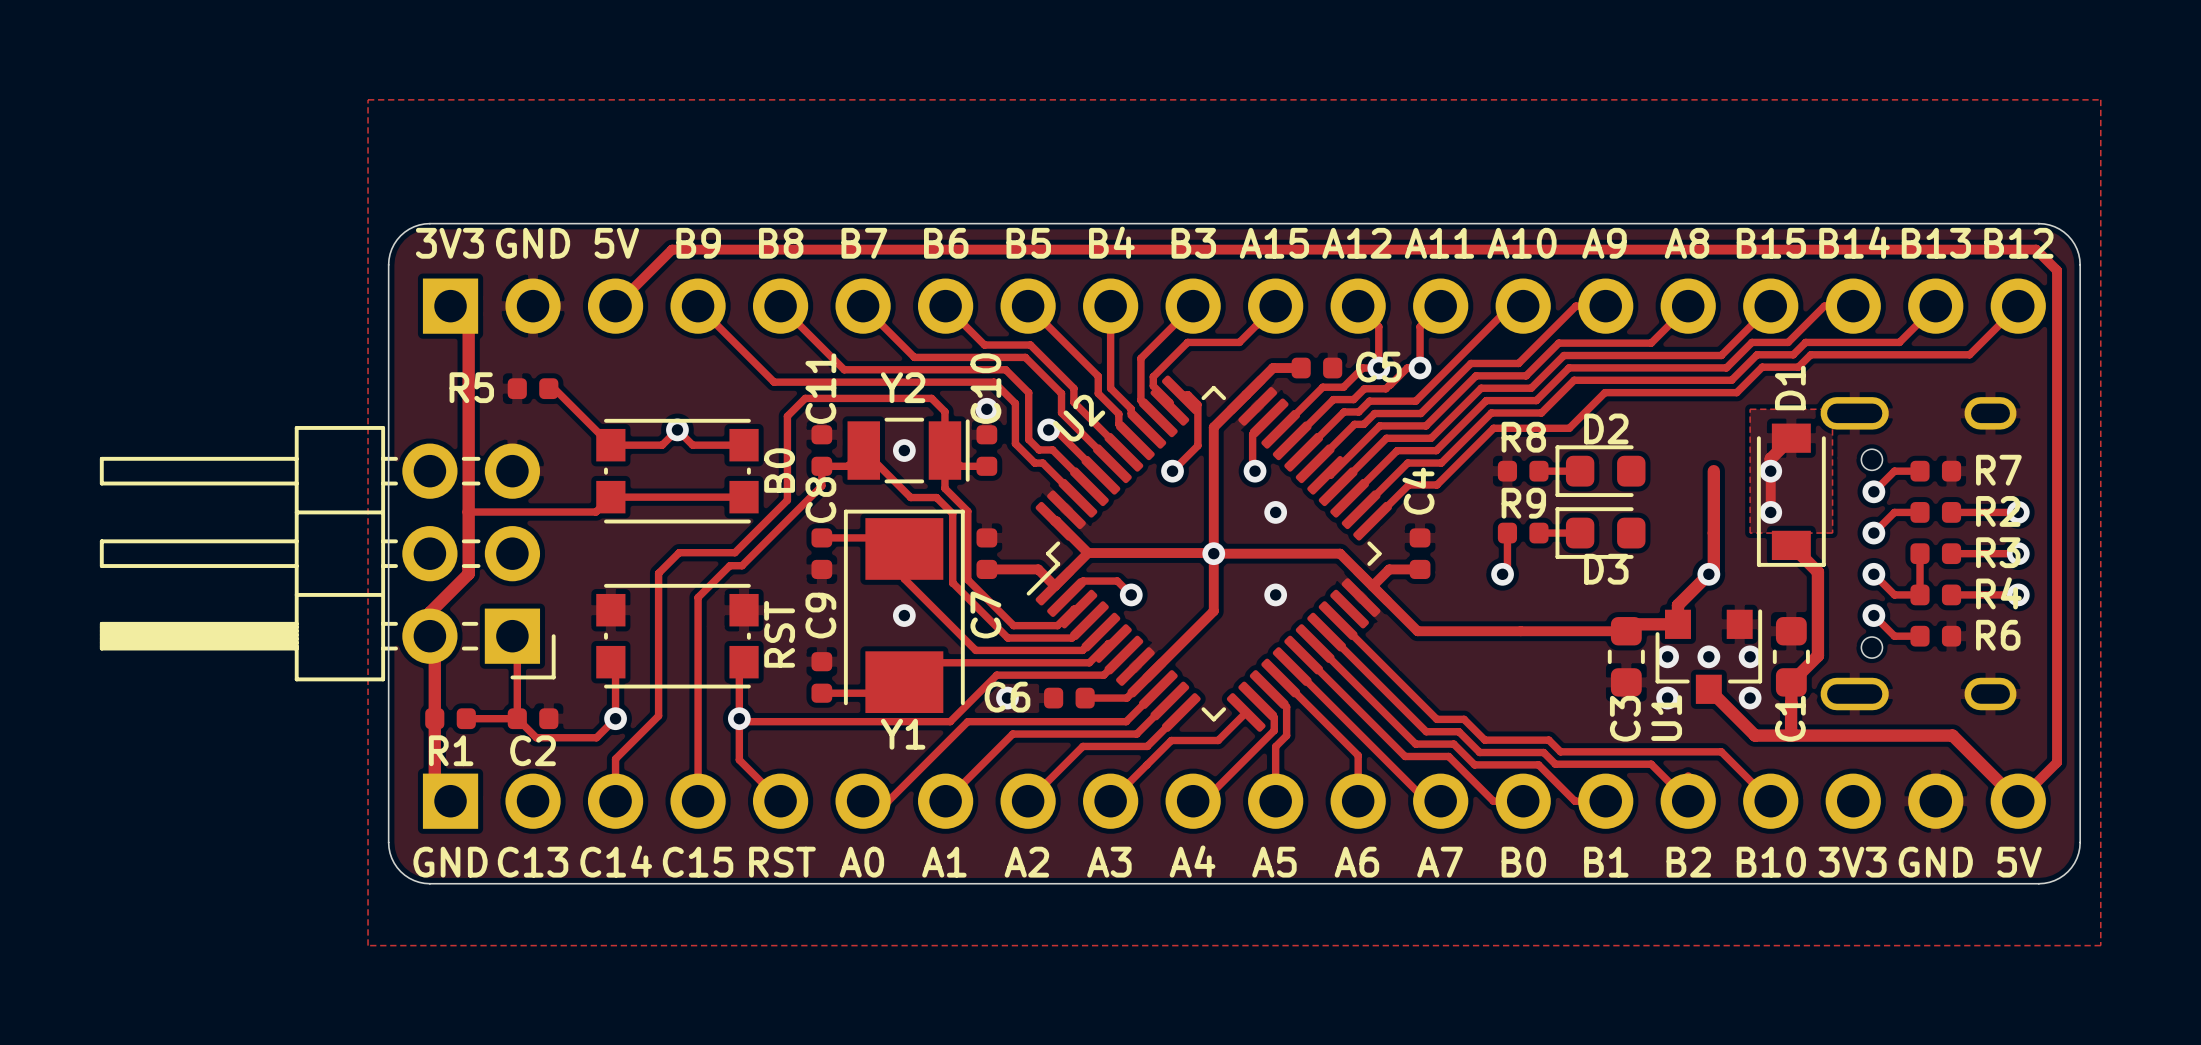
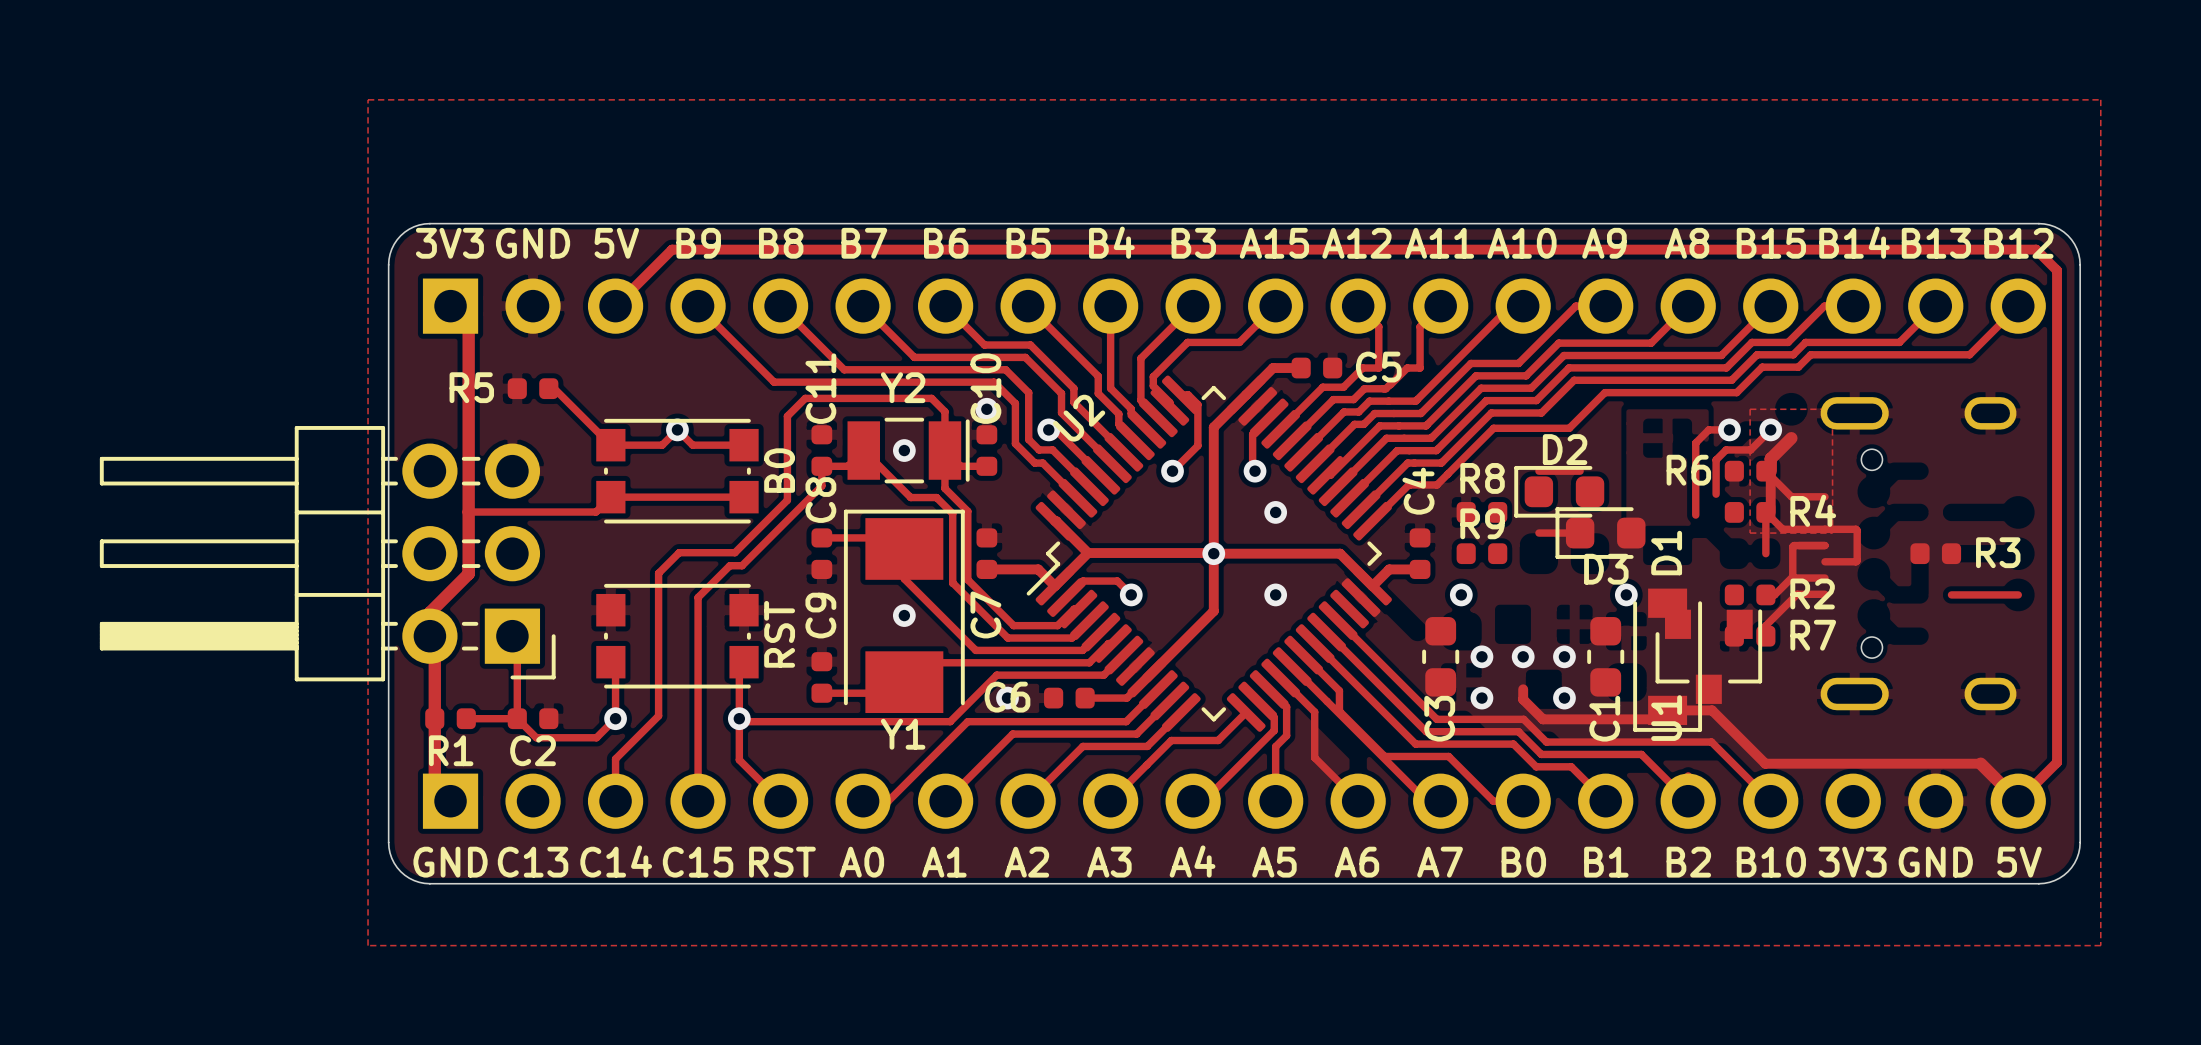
via: (1378, 368) -> none
via: (1420, 368) -> none
track: none -> (1729, 429) (1708, 429) (1695, 443) (1695, 515)
via: none -> (1729, 429)
track: none -> (1770, 429) (1750, 449) (1726, 449) (1716, 459) (1716, 494)
via: none -> (1770, 429)
R8 position: (1523, 471) -> (1481, 512)
D2 position: (1600, 471) -> (1559, 491)
track: (1713, 471) (1713, 569) (1677, 605) (1677, 624) (1633, 624) (1626, 631) (1417, 631) (1372, 586) -> none
track: none -> (1765, 471) (1791, 496) (1824, 496)
via: (1770, 471) -> none
track: (1920, 471) (1894, 471) (1873, 491) -> none
R7 position: (1935, 471) -> (1750, 636)
via: (1873, 491) -> none
D1 position: (1791, 495) -> (1667, 660)
via: (1770, 512) -> none
track: (1920, 512) (1894, 512) (1873, 533) -> none
R2 position: (1935, 512) -> (1750, 594)
track: (1951, 512) (2018, 512) -> none
via: (2018, 512) -> none
track: (1507, 533) (1507, 569) (1502, 574) -> none
R9 position: (1523, 533) -> (1481, 553)
via: (1873, 533) -> none
track: (1791, 545) (1817, 571) (1817, 655) (1791, 682) (1792, 735) -> none
track: none -> (1824, 545) (1794, 545) (1792, 576)
track: none -> (1765, 553) (1765, 512) (1782, 529) (1855, 529) (1857, 560) (1824, 561)
track: (1920, 553) (1920, 594) (1894, 594) (1873, 574) -> none
track: (1951, 553) (2018, 553) -> none
via: (2018, 553) -> none
via: (1502, 574) -> none
via: (1708, 574) -> none
via: (1873, 574) -> none
track: none -> (1792, 576) (1824, 578)
track: none -> (1792, 576) (1774, 594) (1765, 594)
via: none -> (1461, 594)
via: none -> (1626, 594)
track: none -> (1824, 594) (1797, 594) (1765, 625) (1765, 636)
R4 position: (1935, 594) -> (1750, 512)
via: (2018, 594) -> none
track: (1873, 615) (1894, 636) (1920, 636) -> none
via: (1873, 615) -> none
R6 name position: R6 (1998, 635) -> R6 (1688, 470)
R6 position: (1935, 636) -> (1750, 471)
via: none -> (1481, 656)
via: none -> (1523, 656)
via: none -> (1564, 656)
C3 position: (1626, 656) -> (1440, 656)
via: (1667, 656) -> none
via: (1708, 656) -> none
via: (1750, 656) -> none
C1 position: (1791, 656) -> (1605, 656)
track: (1708, 689) (1755, 735) (1952, 735) (1980, 763) -> (1523, 689) (1523, 699) (1543, 719) (1658, 719) (1667, 710) (1712, 710) (1765, 763) (1980, 763)
track: (1339, 690) (1405, 756) -> (1339, 690) (1339, 711) (1384, 756) (1405, 756)
via: none -> (1481, 698)
via: none -> (1564, 698)
via: (1667, 698) -> none
via: (1750, 698) -> none
track: (1314, 712) (1358, 755) (1358, 801) -> (1314, 712) (1314, 757) (1358, 801)
track: (1464, 719) (1484, 740) (1548, 740) (1560, 751) (1721, 751) -> (1464, 719) (1523, 719) (1546, 742) (1711, 742) (1721, 751)
track: (1458, 731) (1479, 752) (1543, 752) (1555, 764) (1651, 764) -> (1458, 731) (1518, 731) (1541, 754) (1641, 754) (1651, 764)
track: (1453, 744) (1474, 764) (1538, 764) (1574, 801) (1598, 801) -> (1453, 744) (1513, 744) (1536, 766) (1571, 766) (1605, 801)

